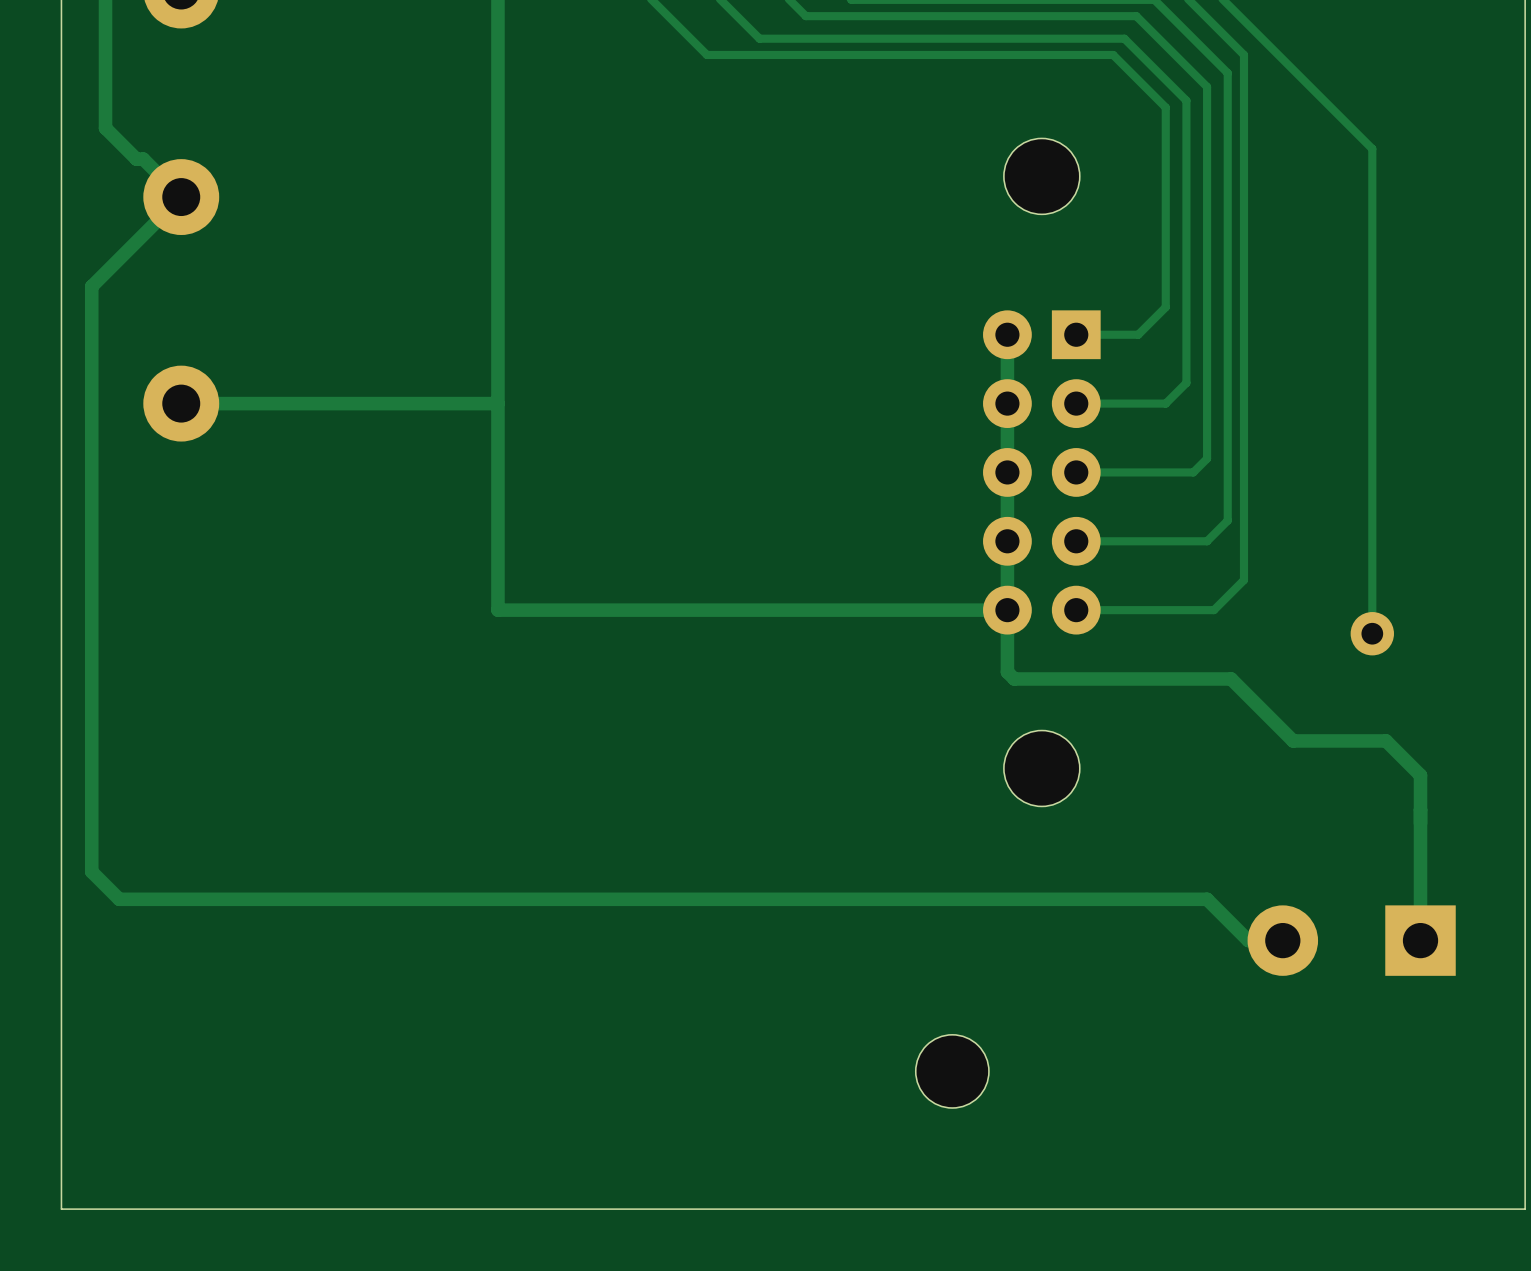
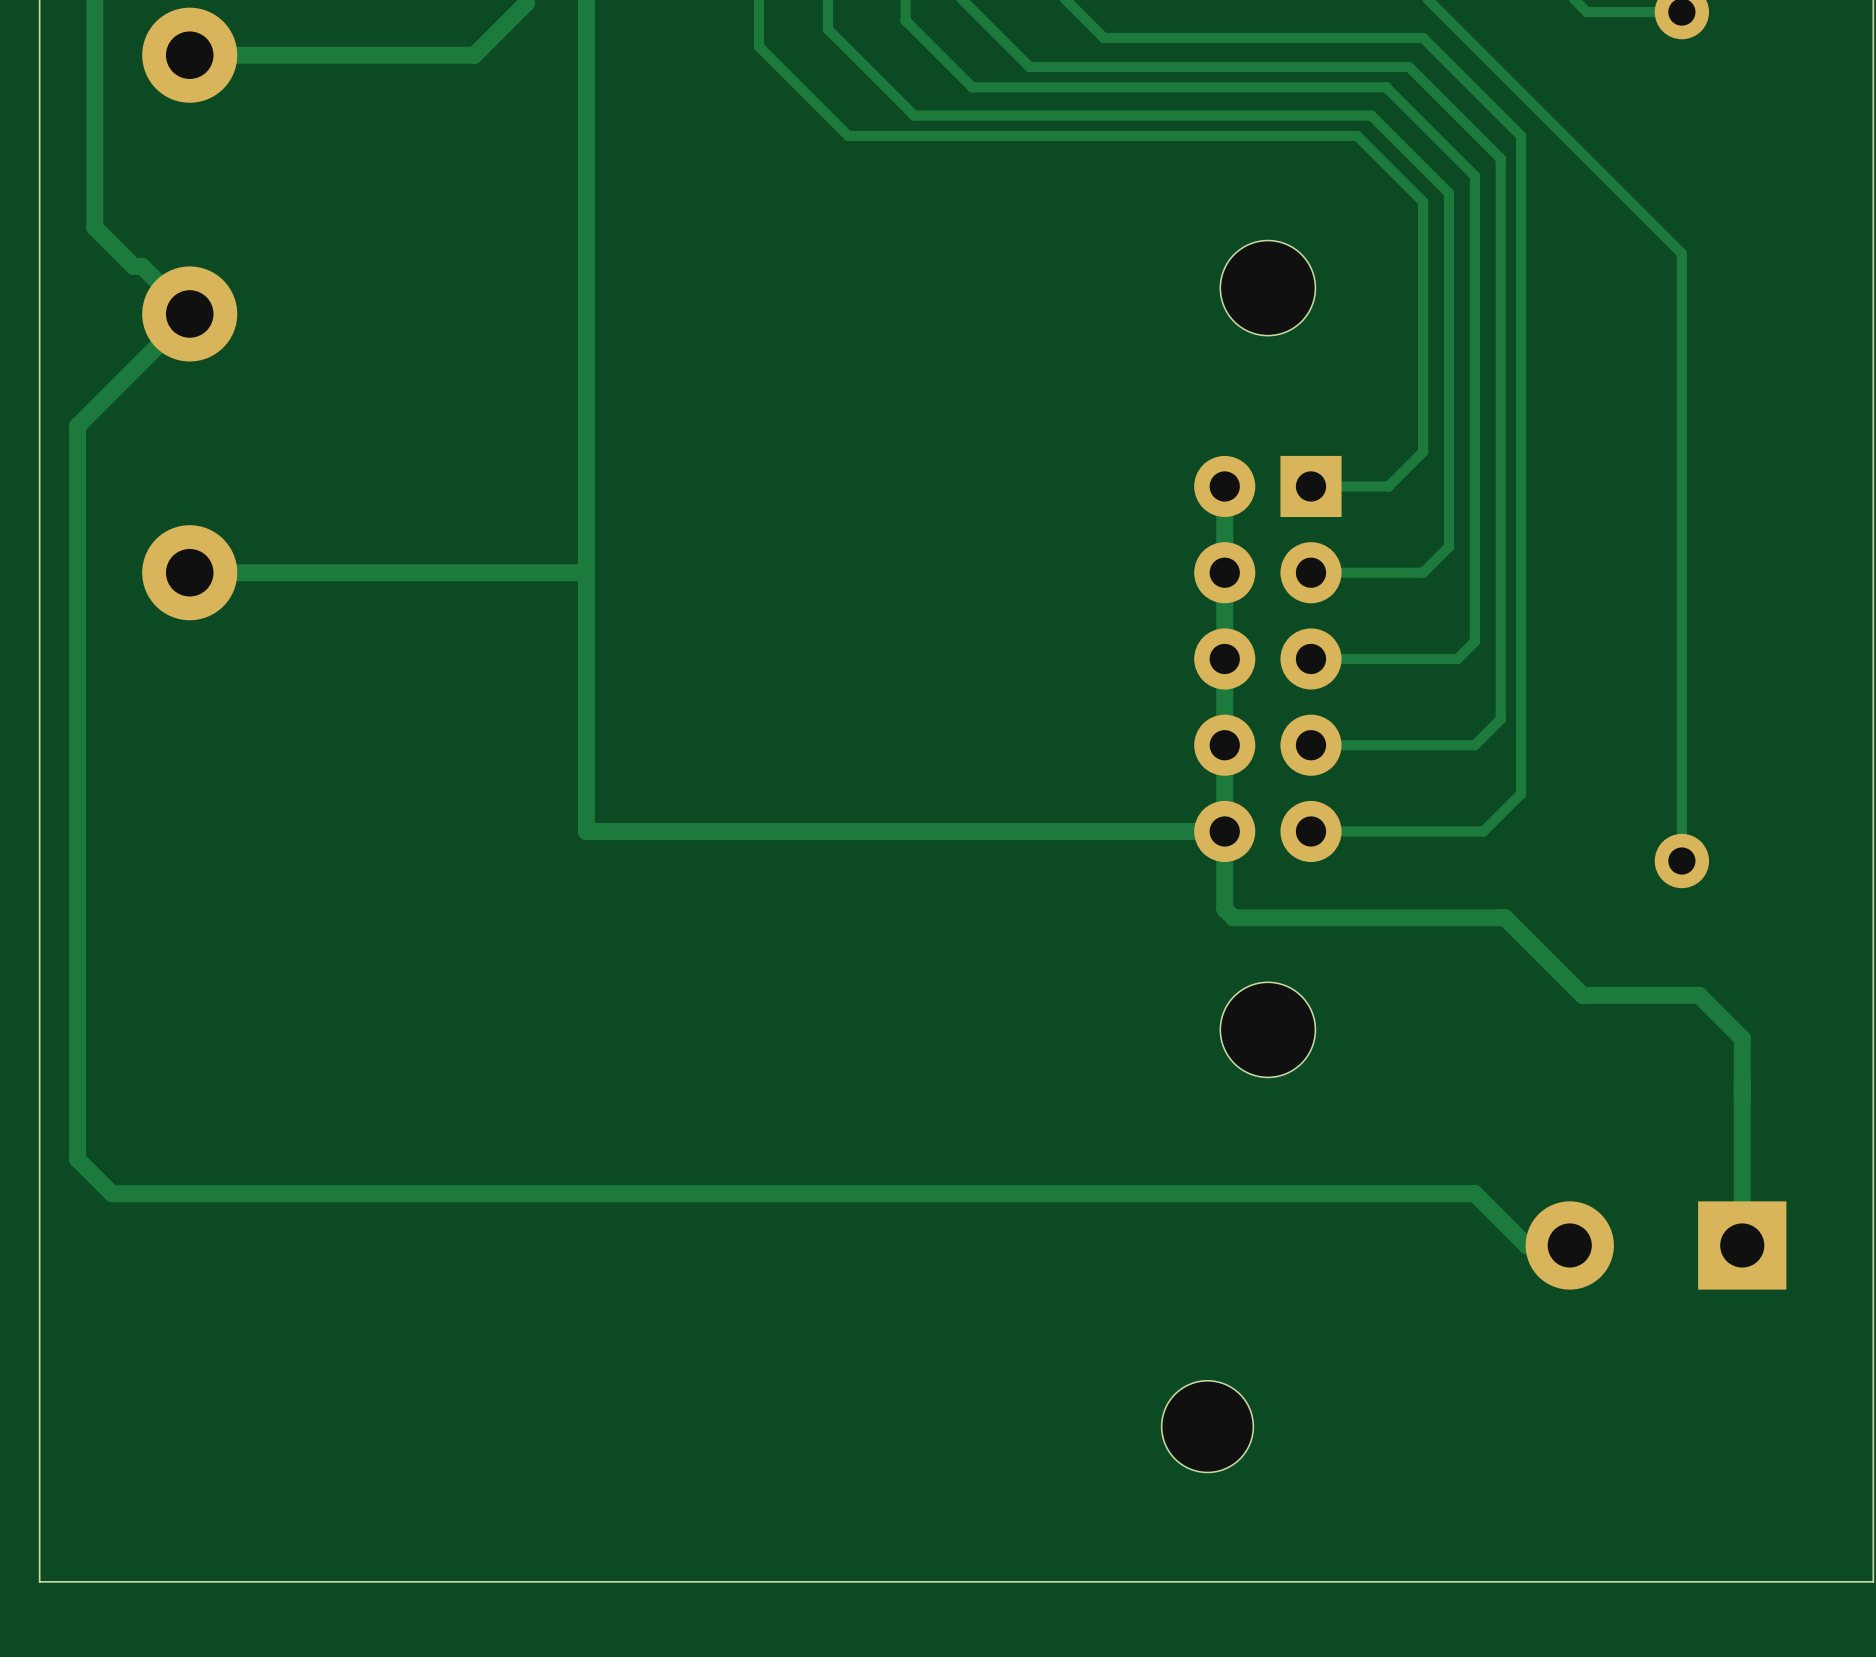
part position: (952, 1071) -> (1207, 1426)

